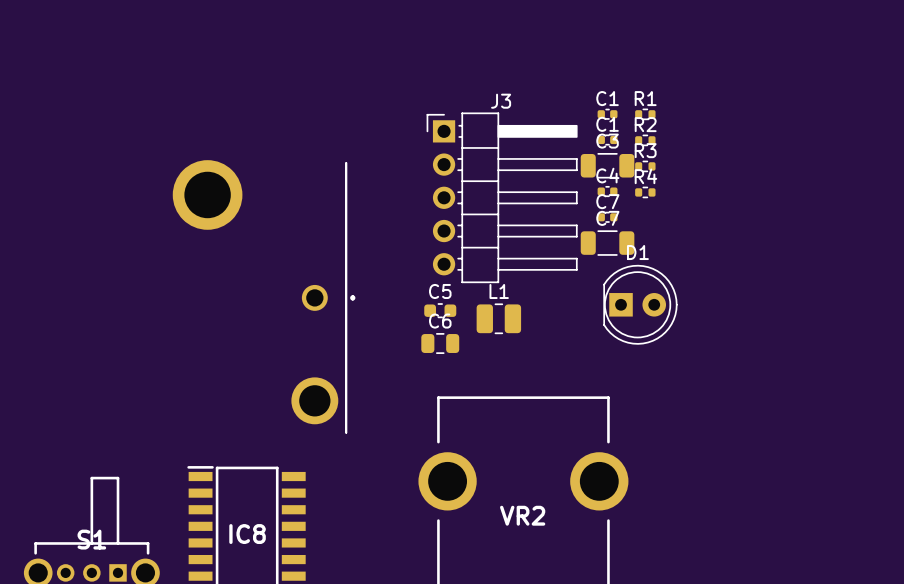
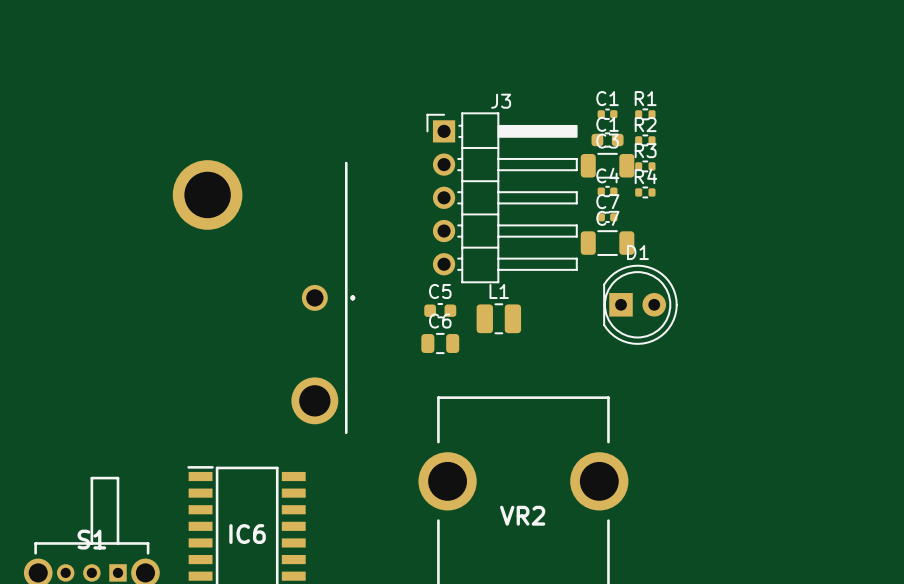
C1 footprint: [597, 134, 618, 146] -> [591, 132, 624, 148]
IC8 name: IC8 (247, 534) -> IC6 (247, 534)

